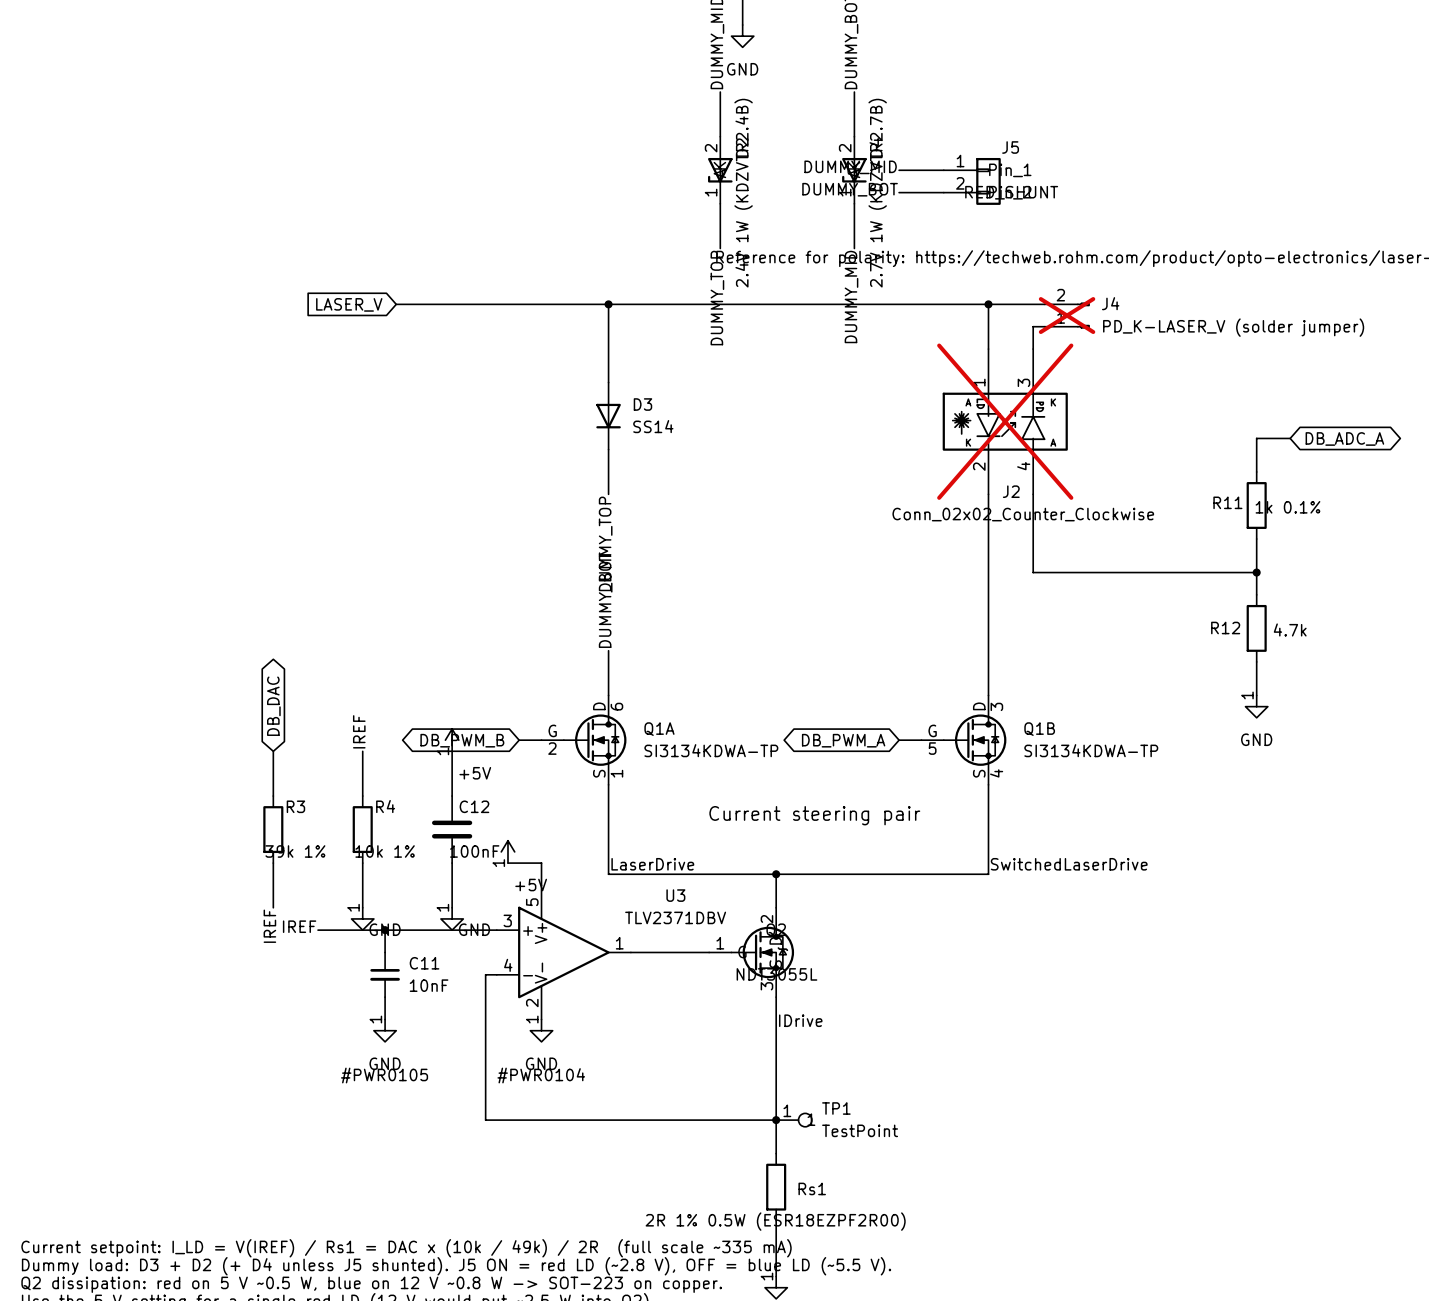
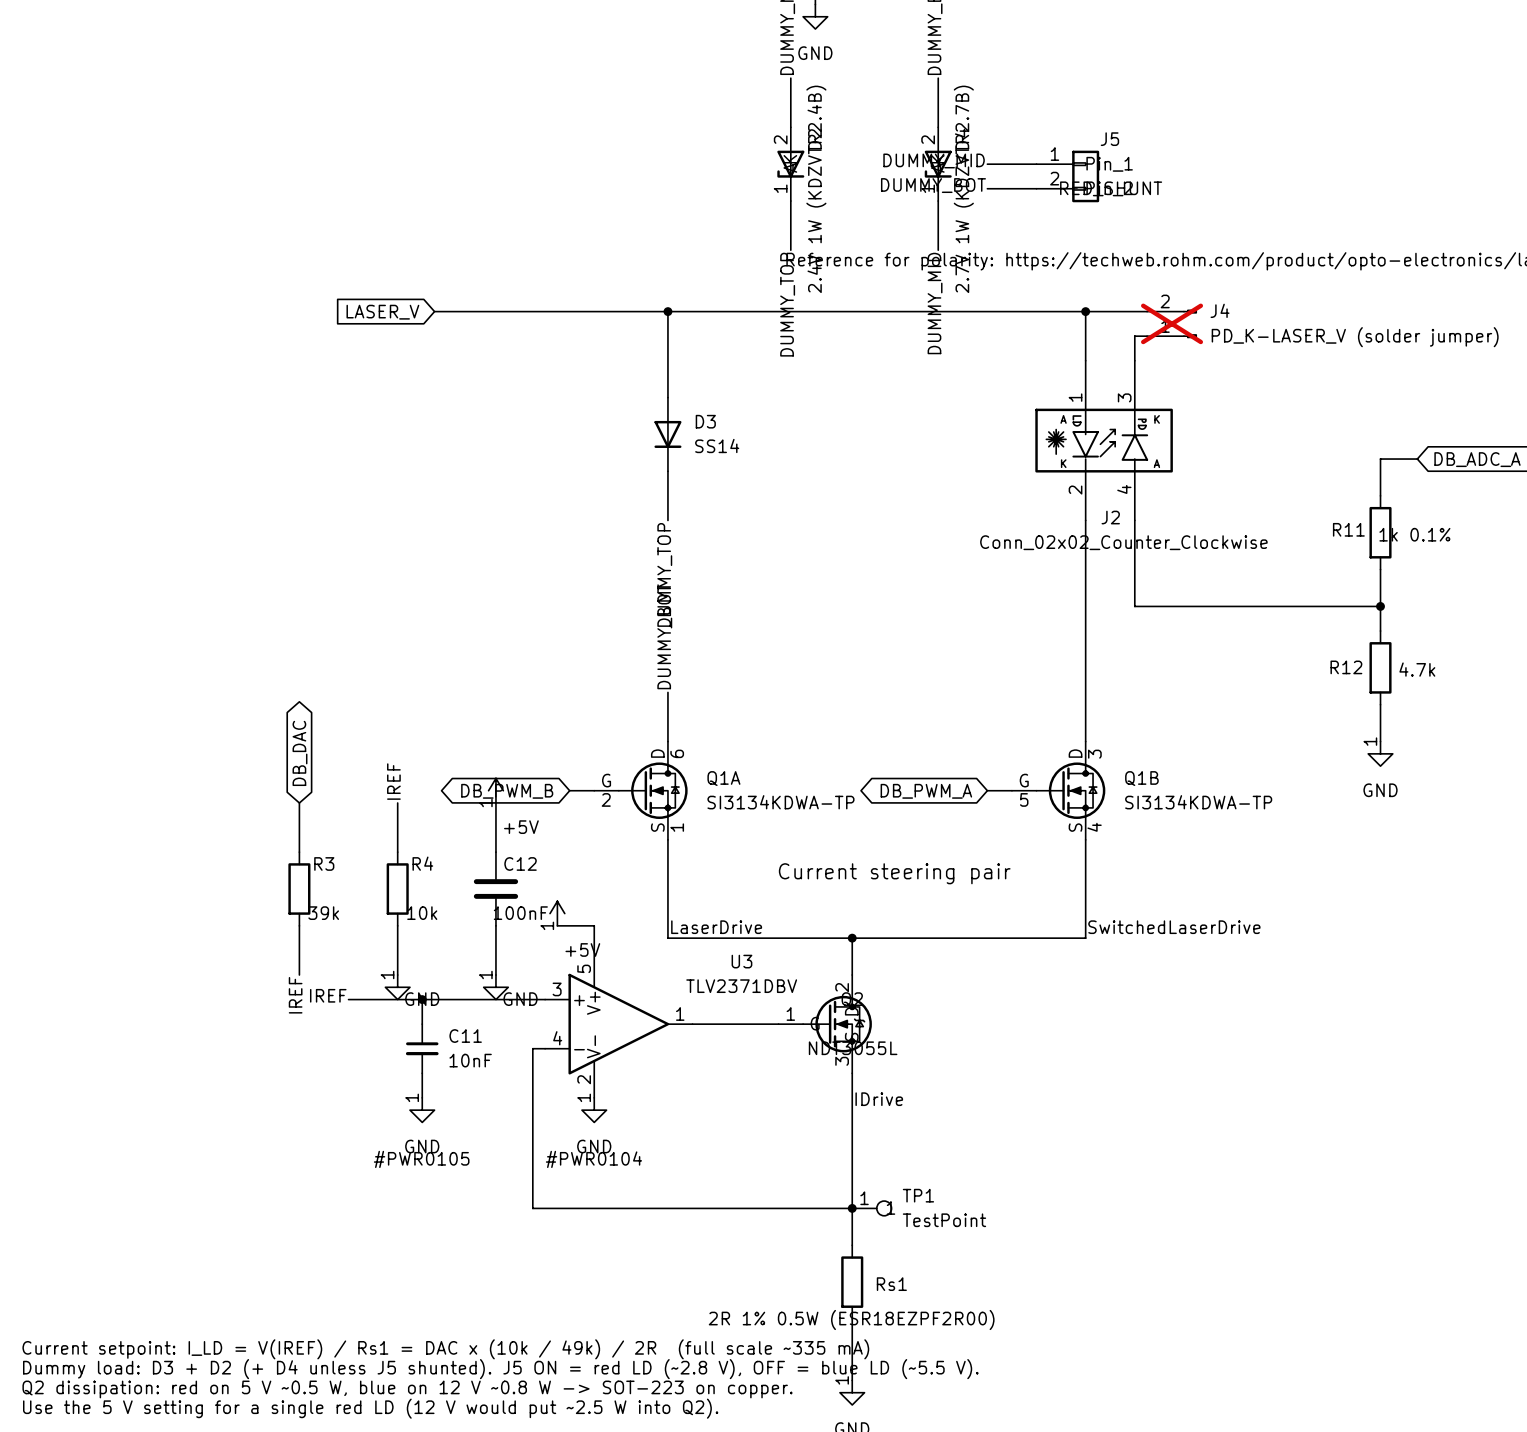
J2 do-not-place cross: (1005, 421) -> none
R3 value: 39k 1% (295, 851) -> 39k (323, 913)
R4 value: 10k 1% (385, 851) -> 10k (422, 913)

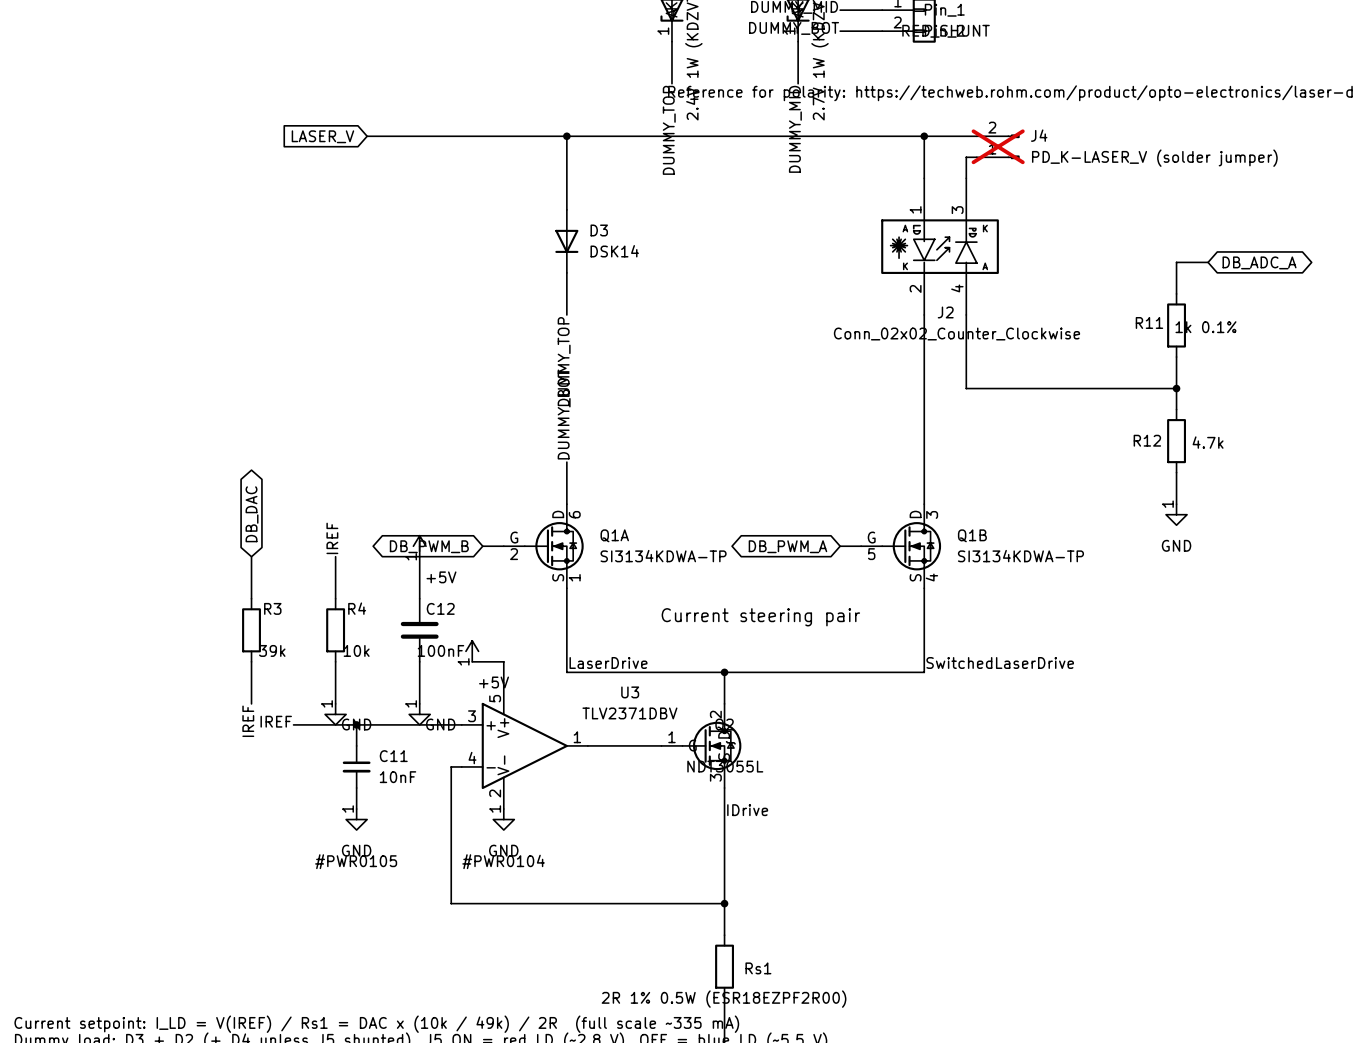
D3 value: SS14 (717, 445) -> DSK14 (614, 251)
TP1: TestPoint (871, 1208) -> none

